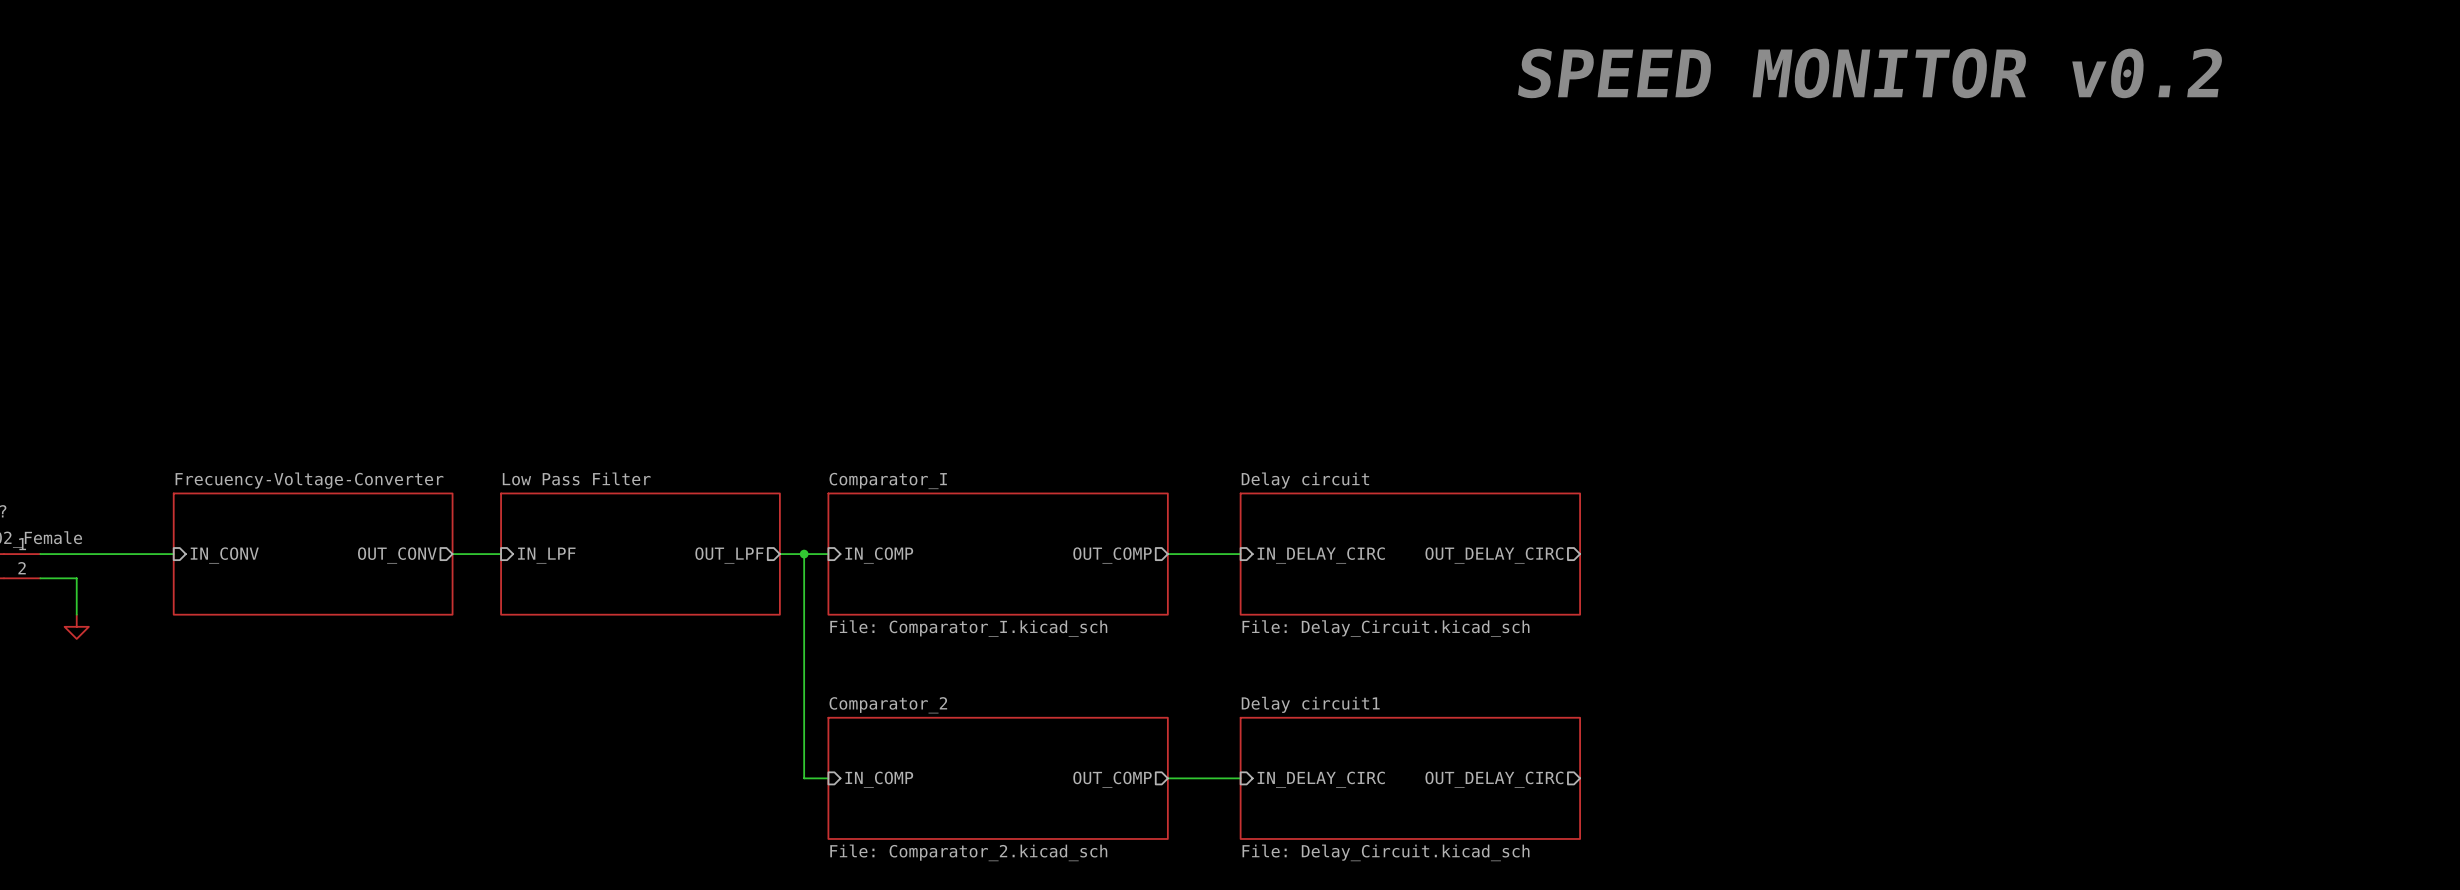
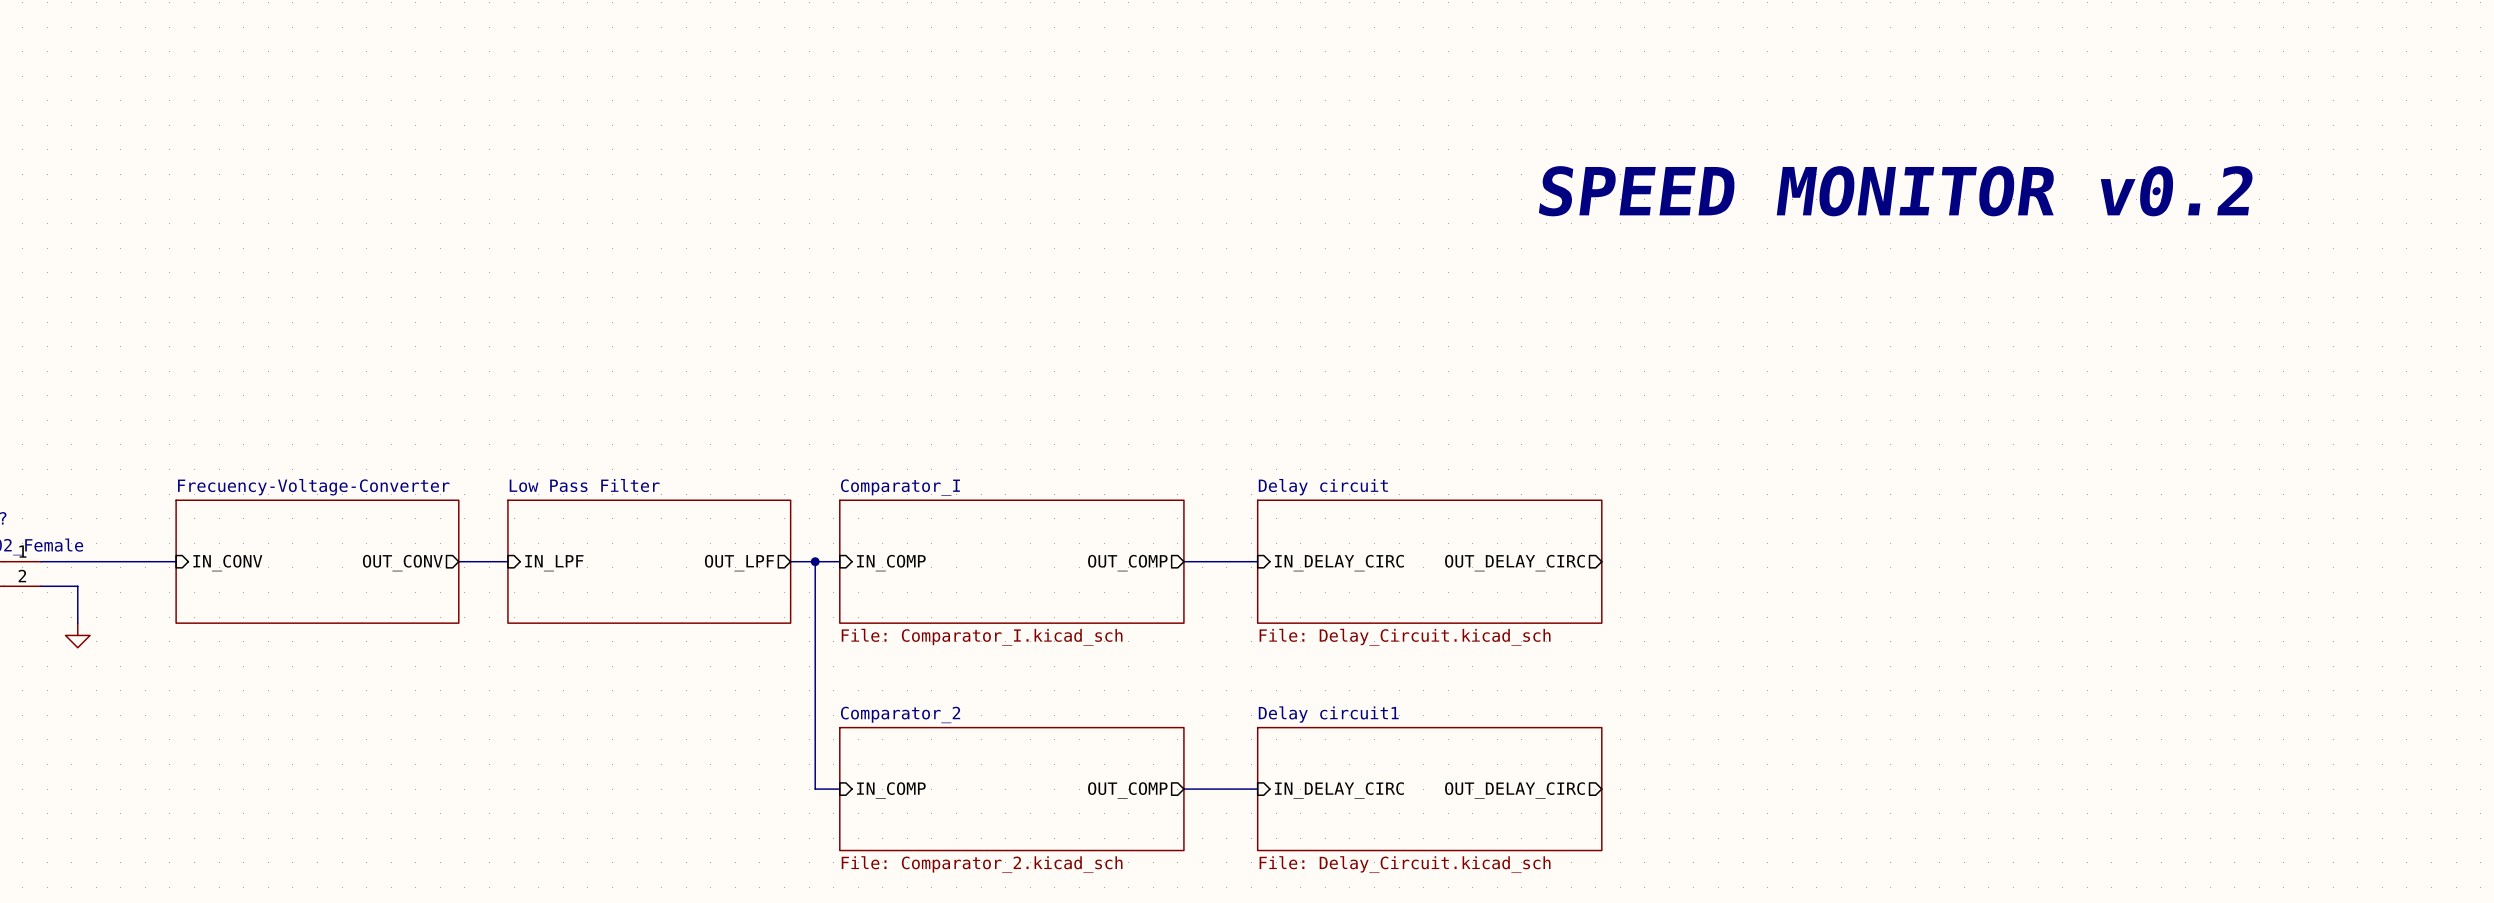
text position: SPEED MONITOR v0.2 (1870, 73) -> SPEED MONITOR v0.2 (1896, 191)

